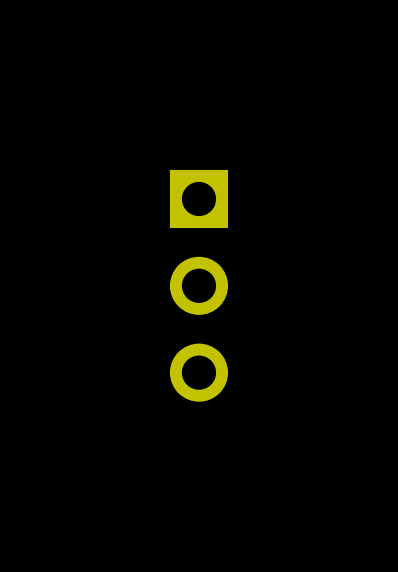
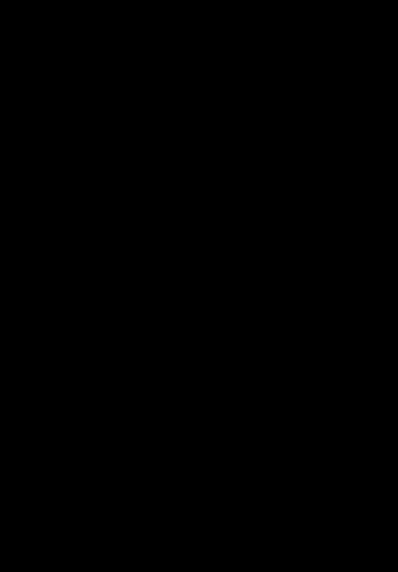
part: (198, 285) -> none

